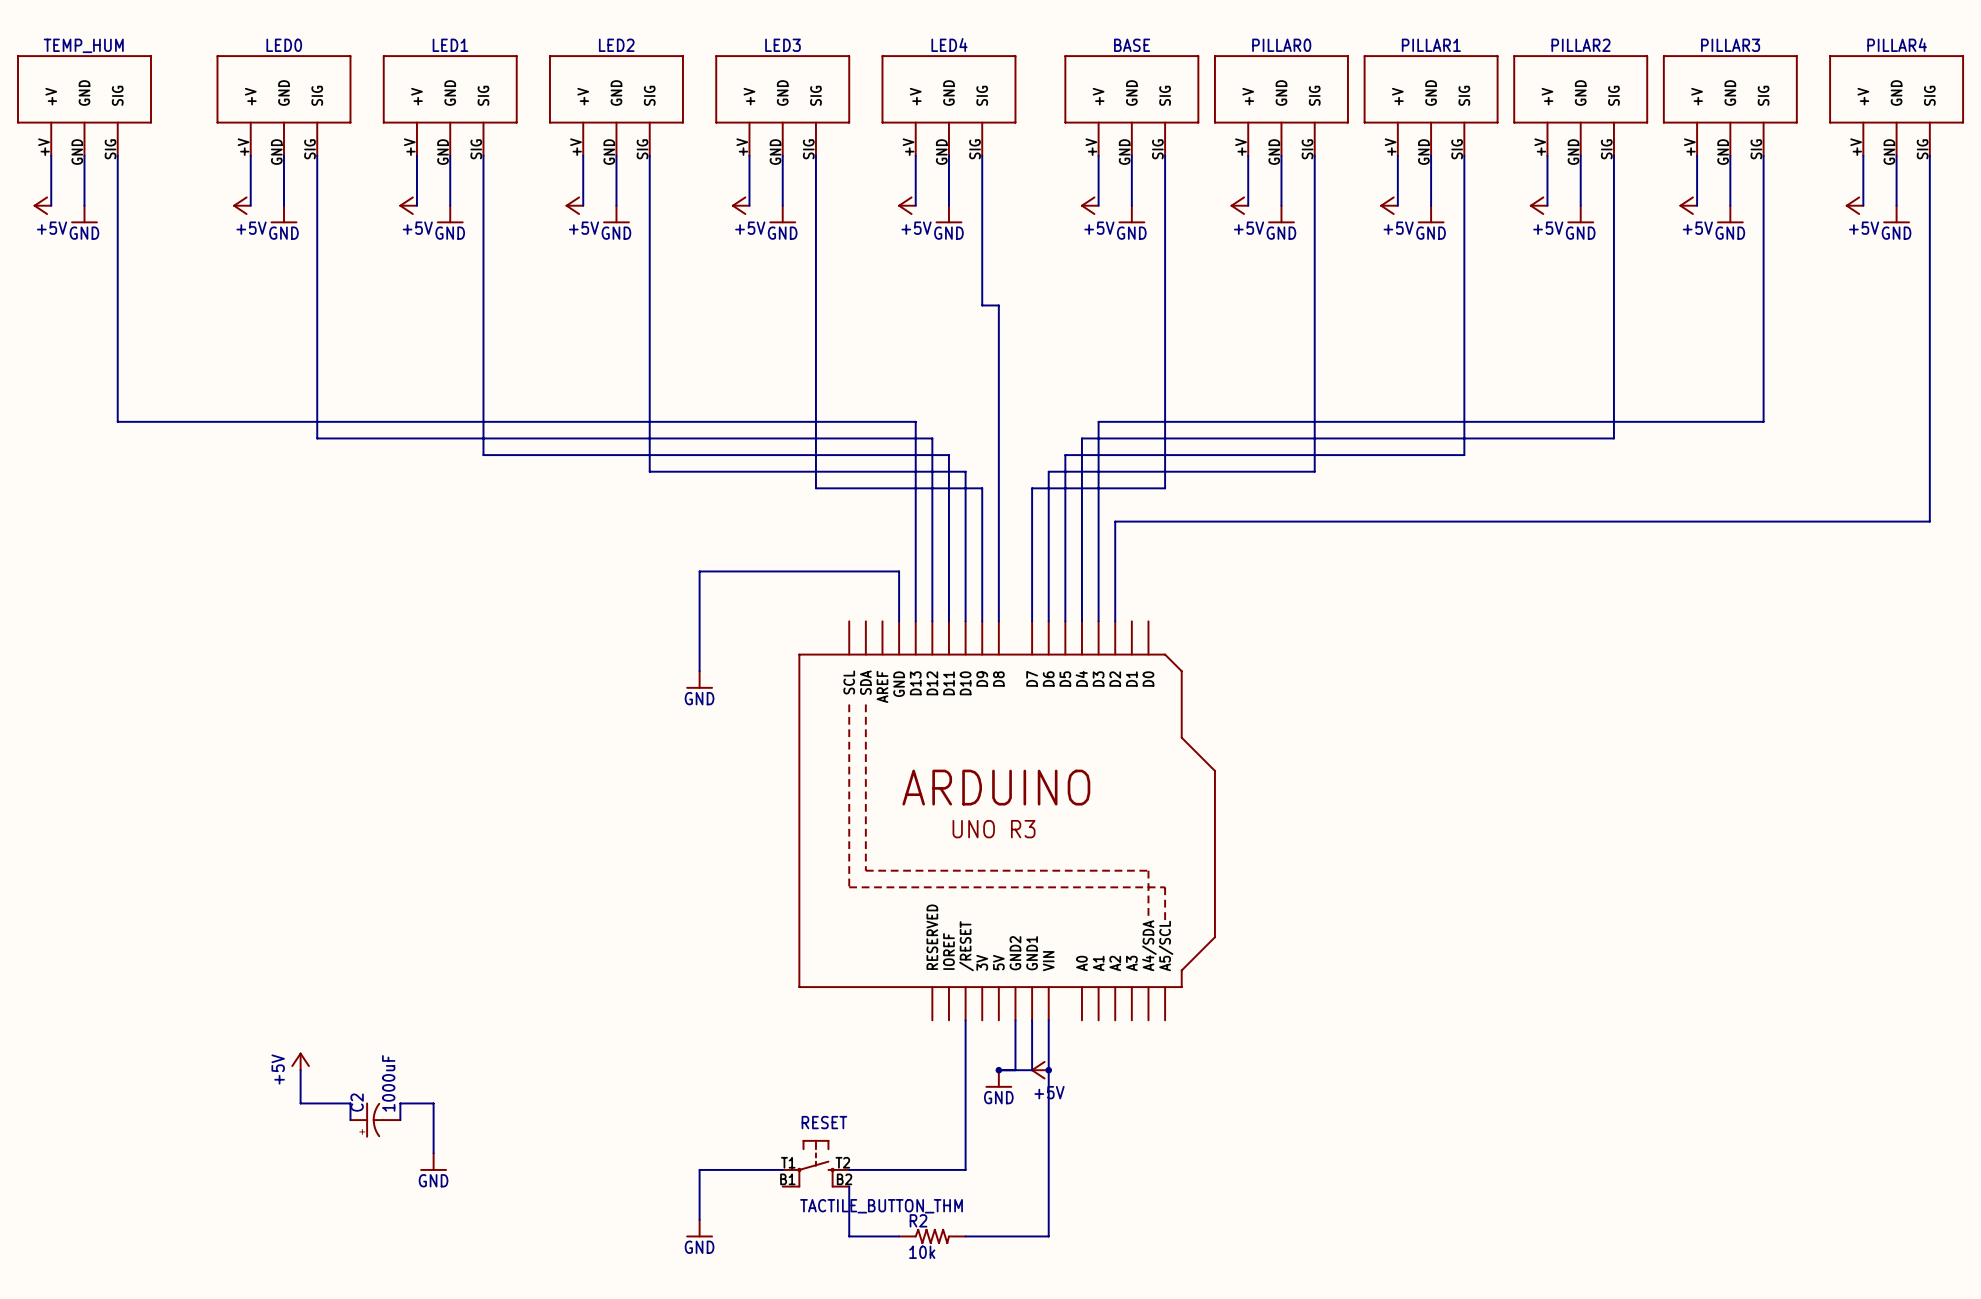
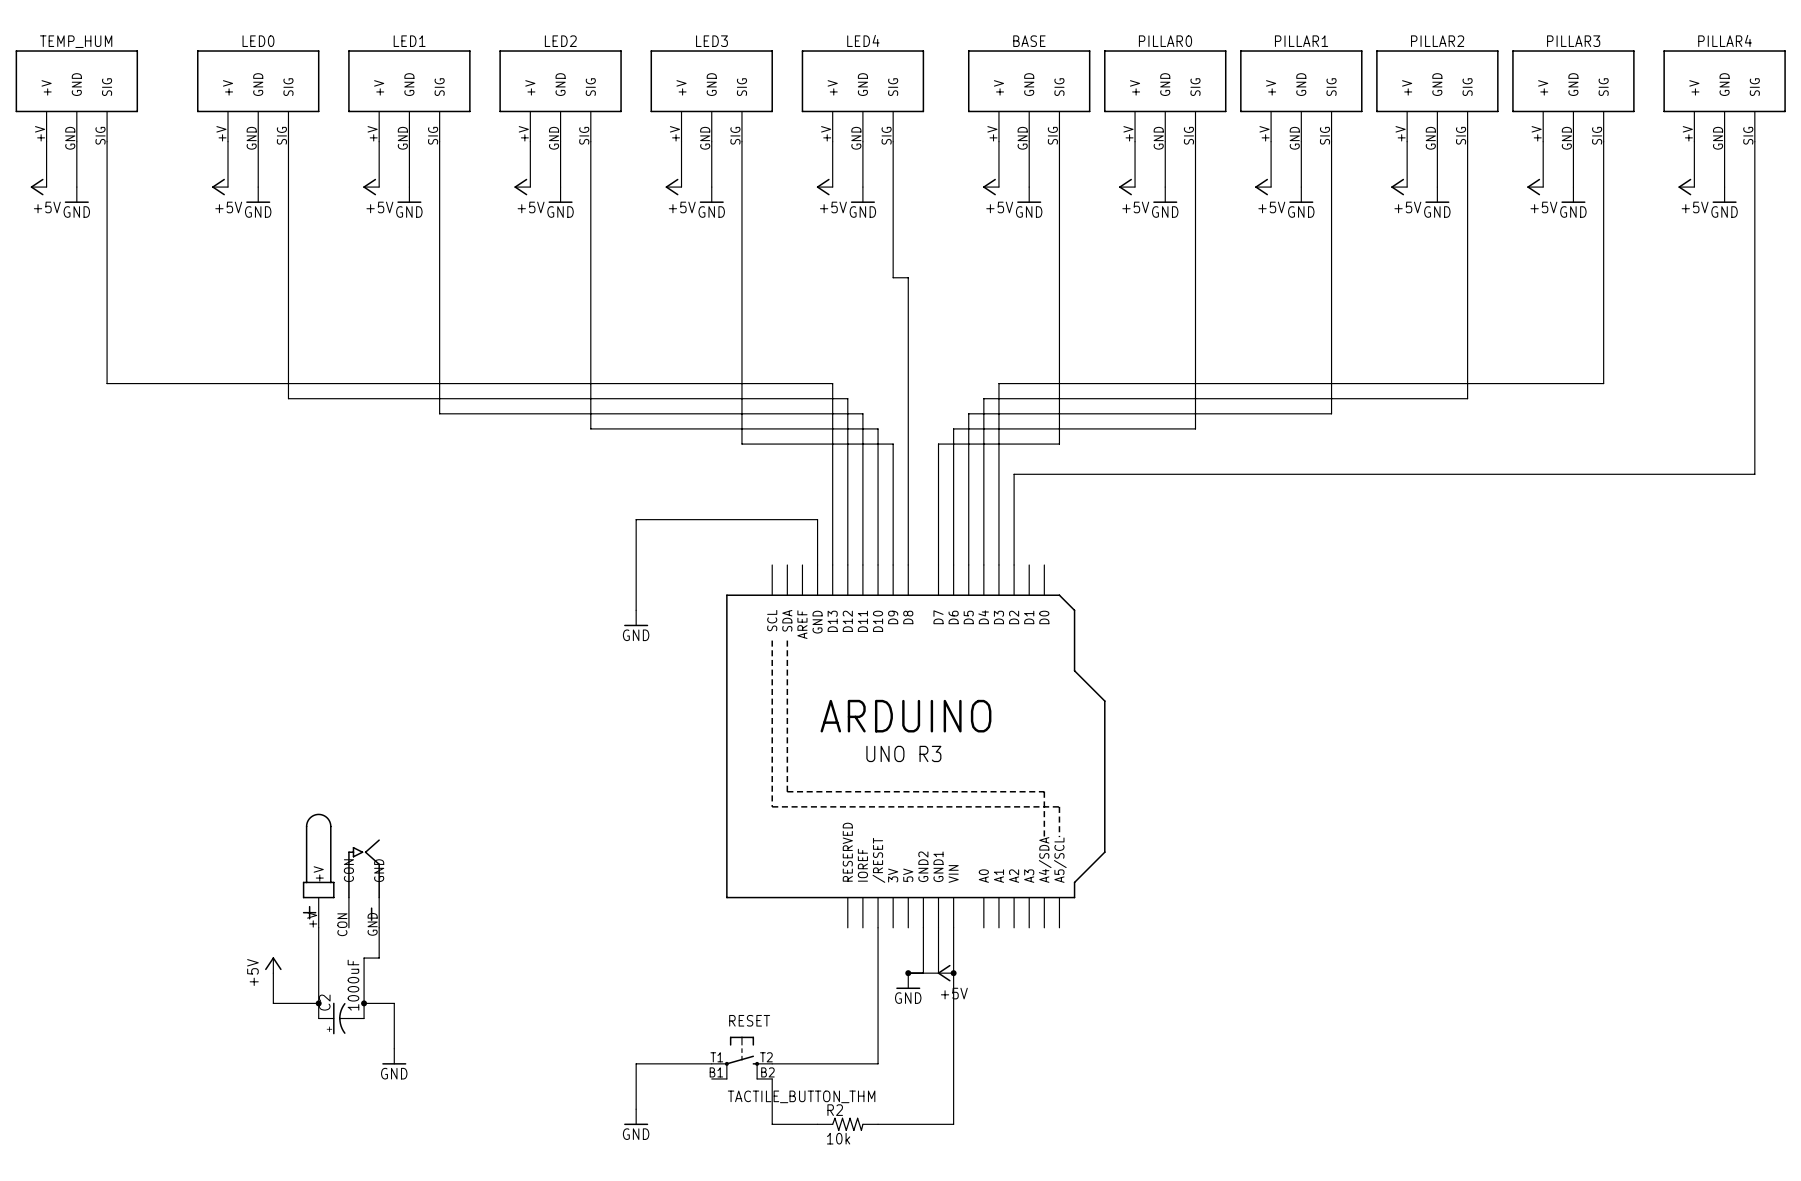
part: none -> (341, 870)
wire: none -> (318, 927) (318, 1003)
wire: none -> (379, 927) (379, 958) (364, 958) (364, 1003)
junction: none -> (318, 1003)
junction: none -> (364, 1003)

